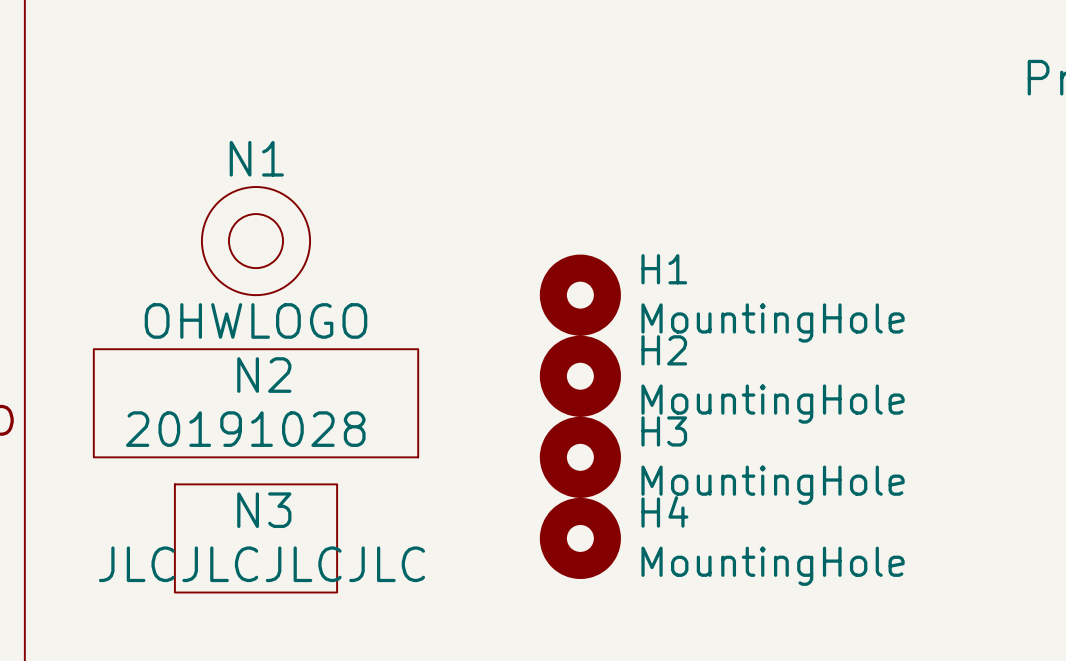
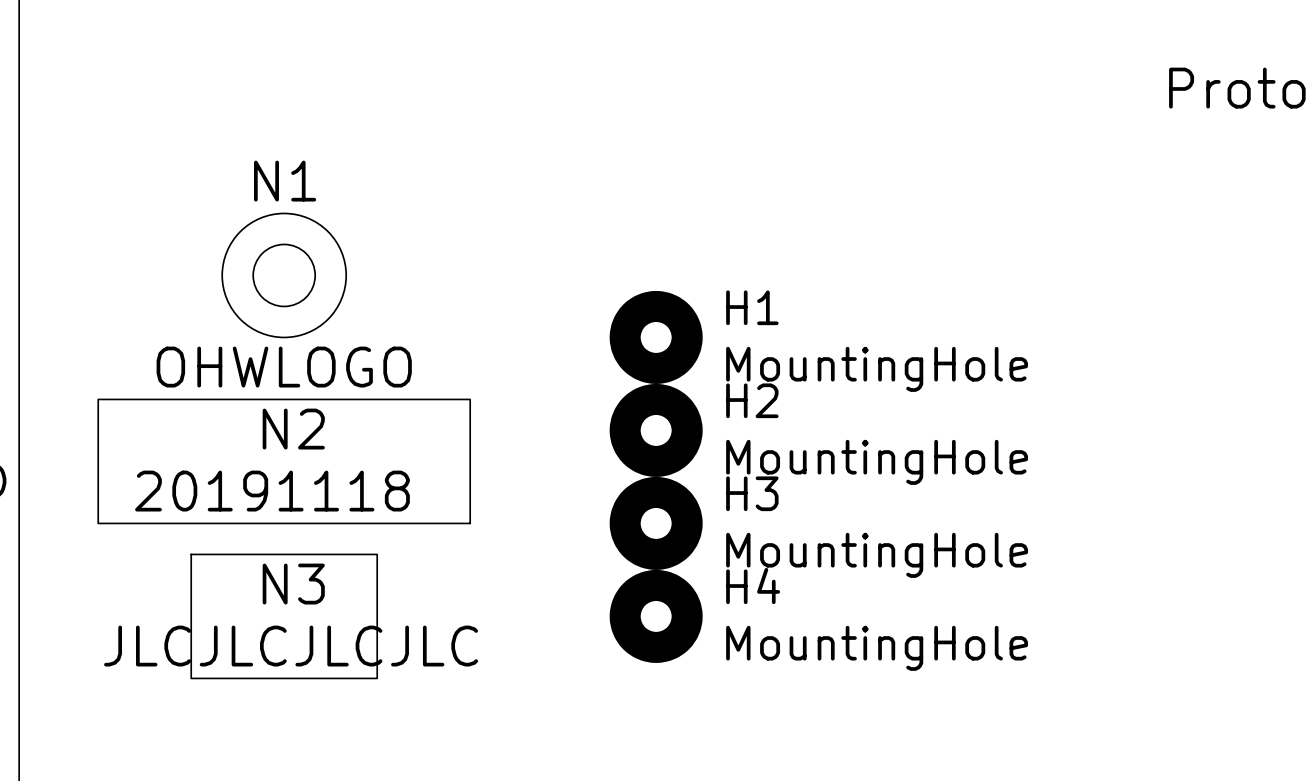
N2 value: 20191028 (245, 429) -> 20191118 (272, 491)

